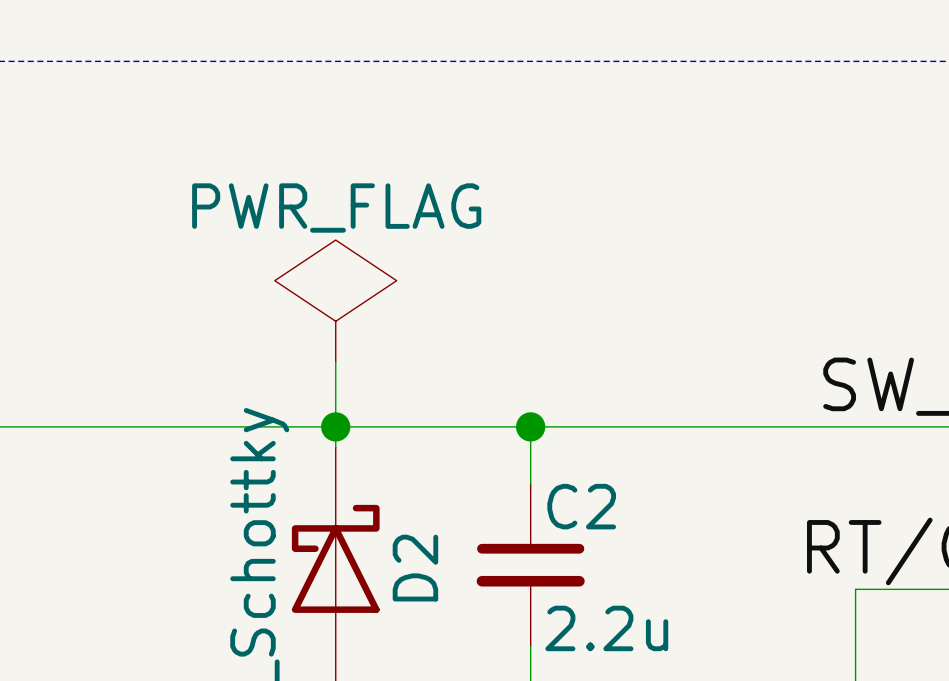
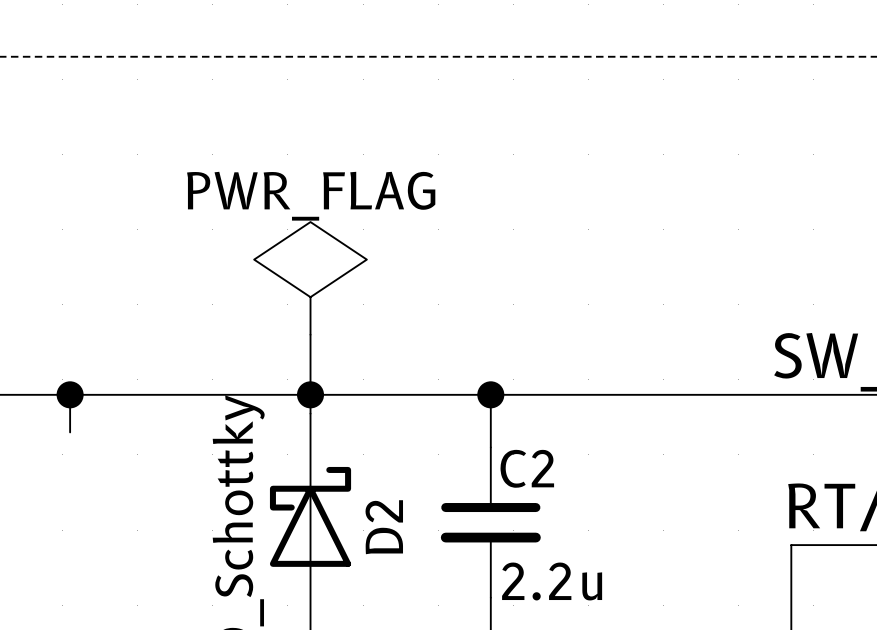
wire: none -> (70, 394) (70, 432)
junction: none -> (70, 394)

